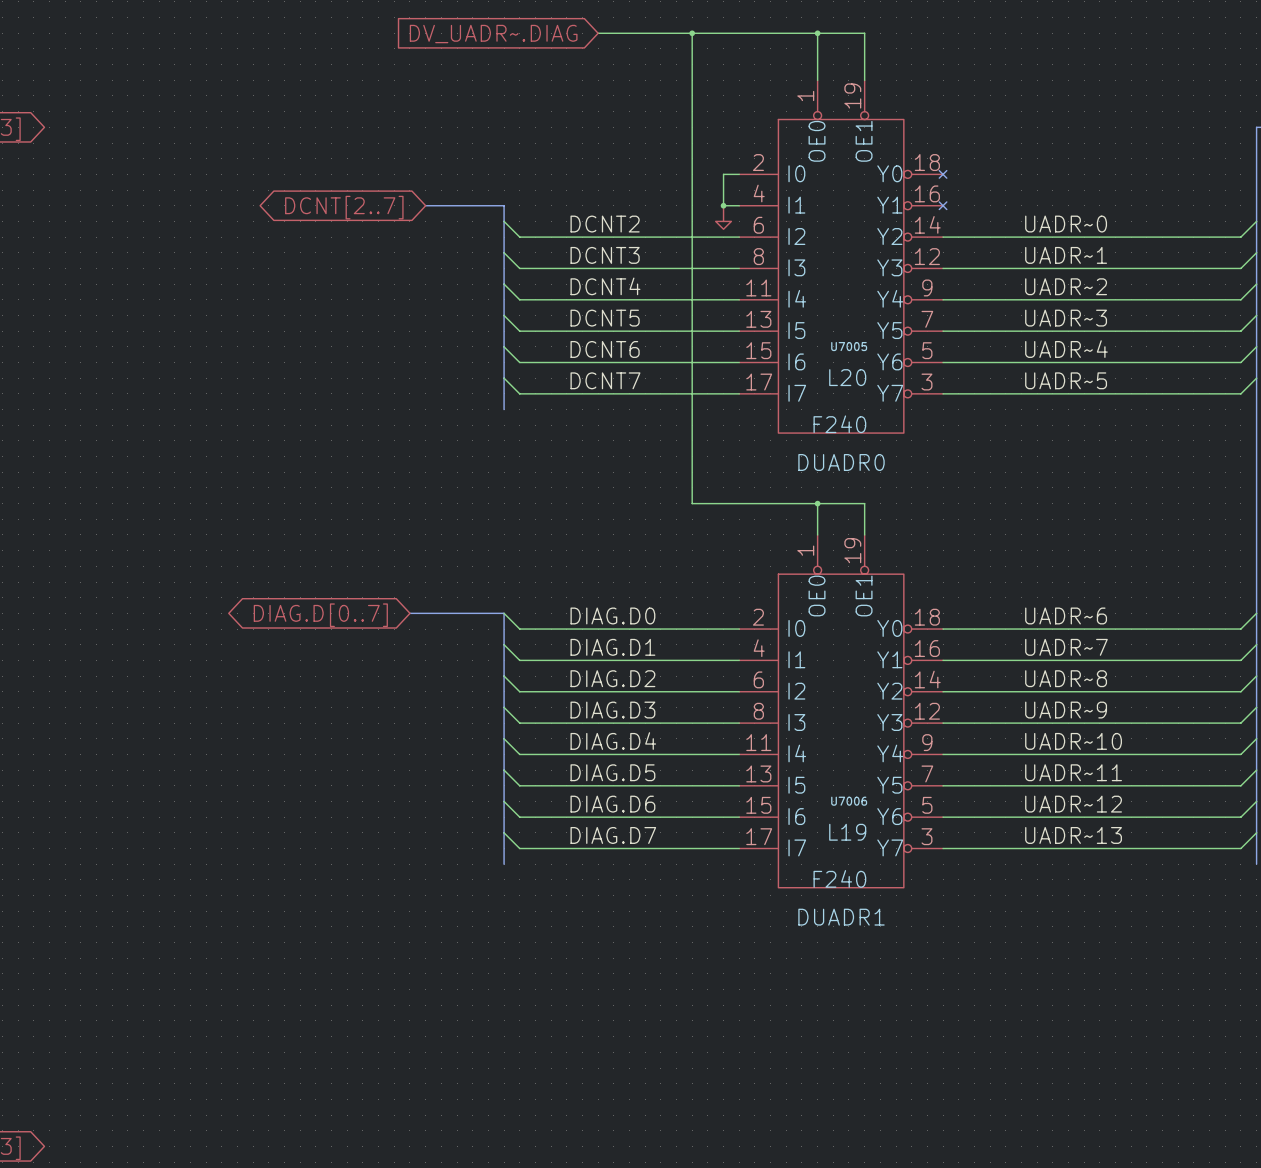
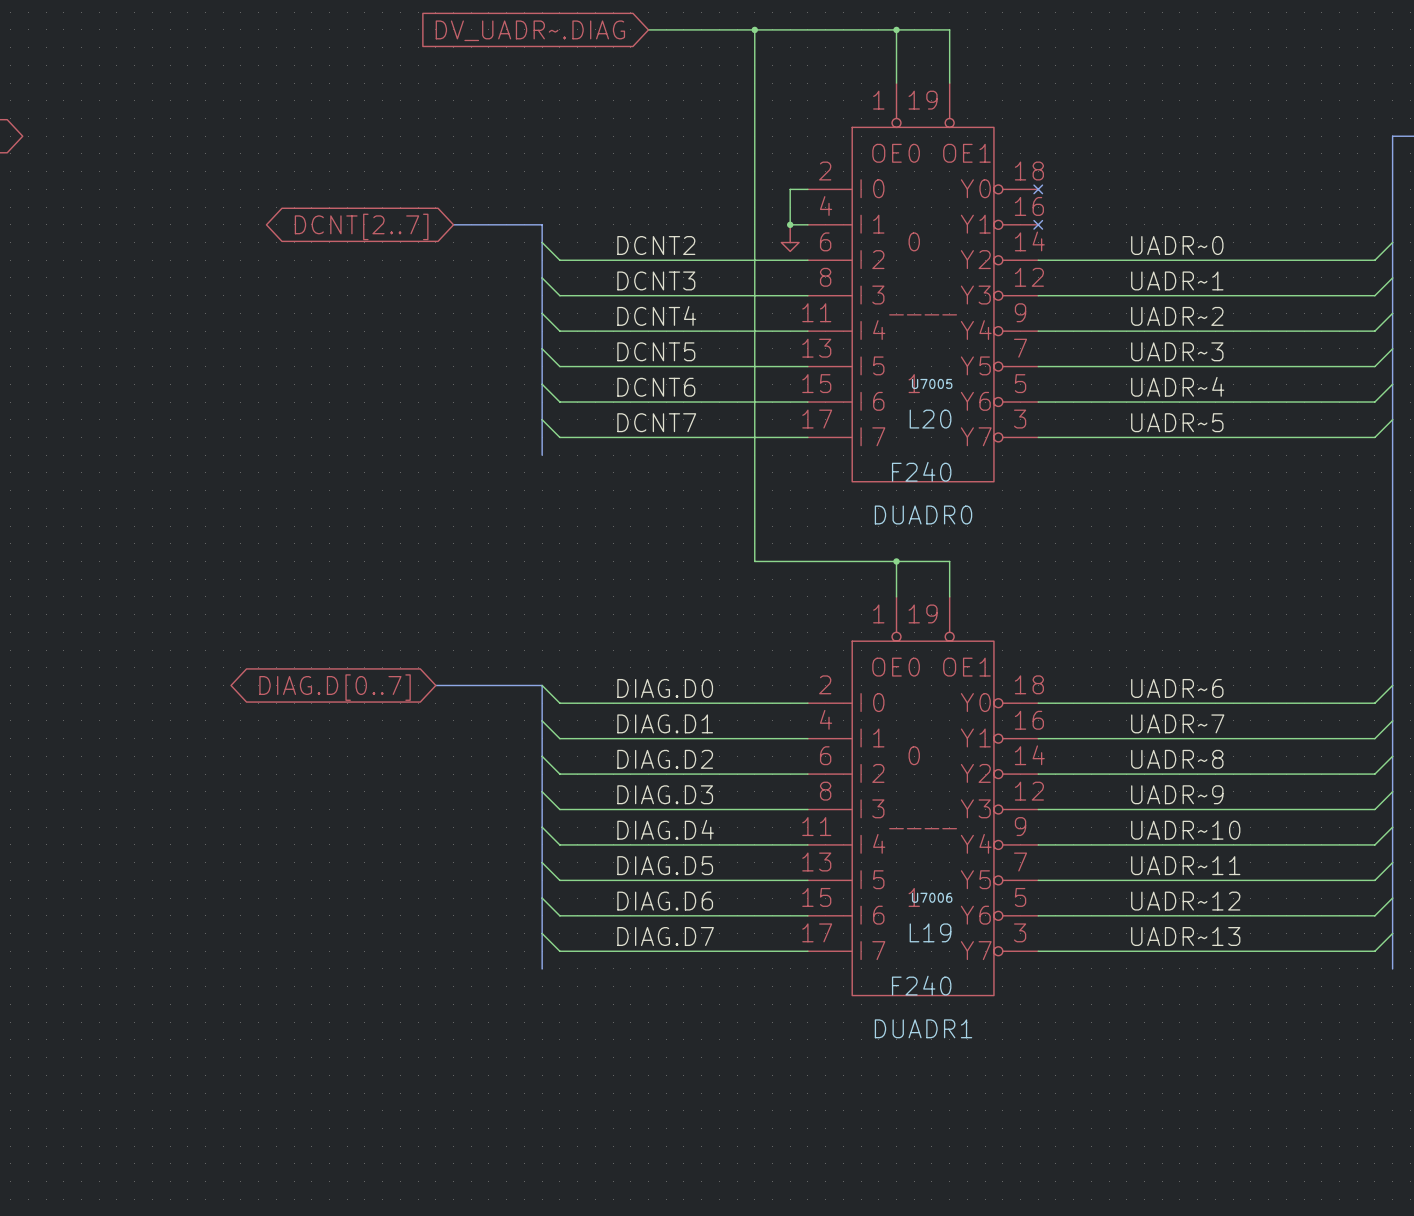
U7005 symbol: [739, 80, 944, 434] -> [807, 83, 1039, 482]
U7006 symbol: [739, 534, 944, 888] -> [807, 596, 1039, 996]

